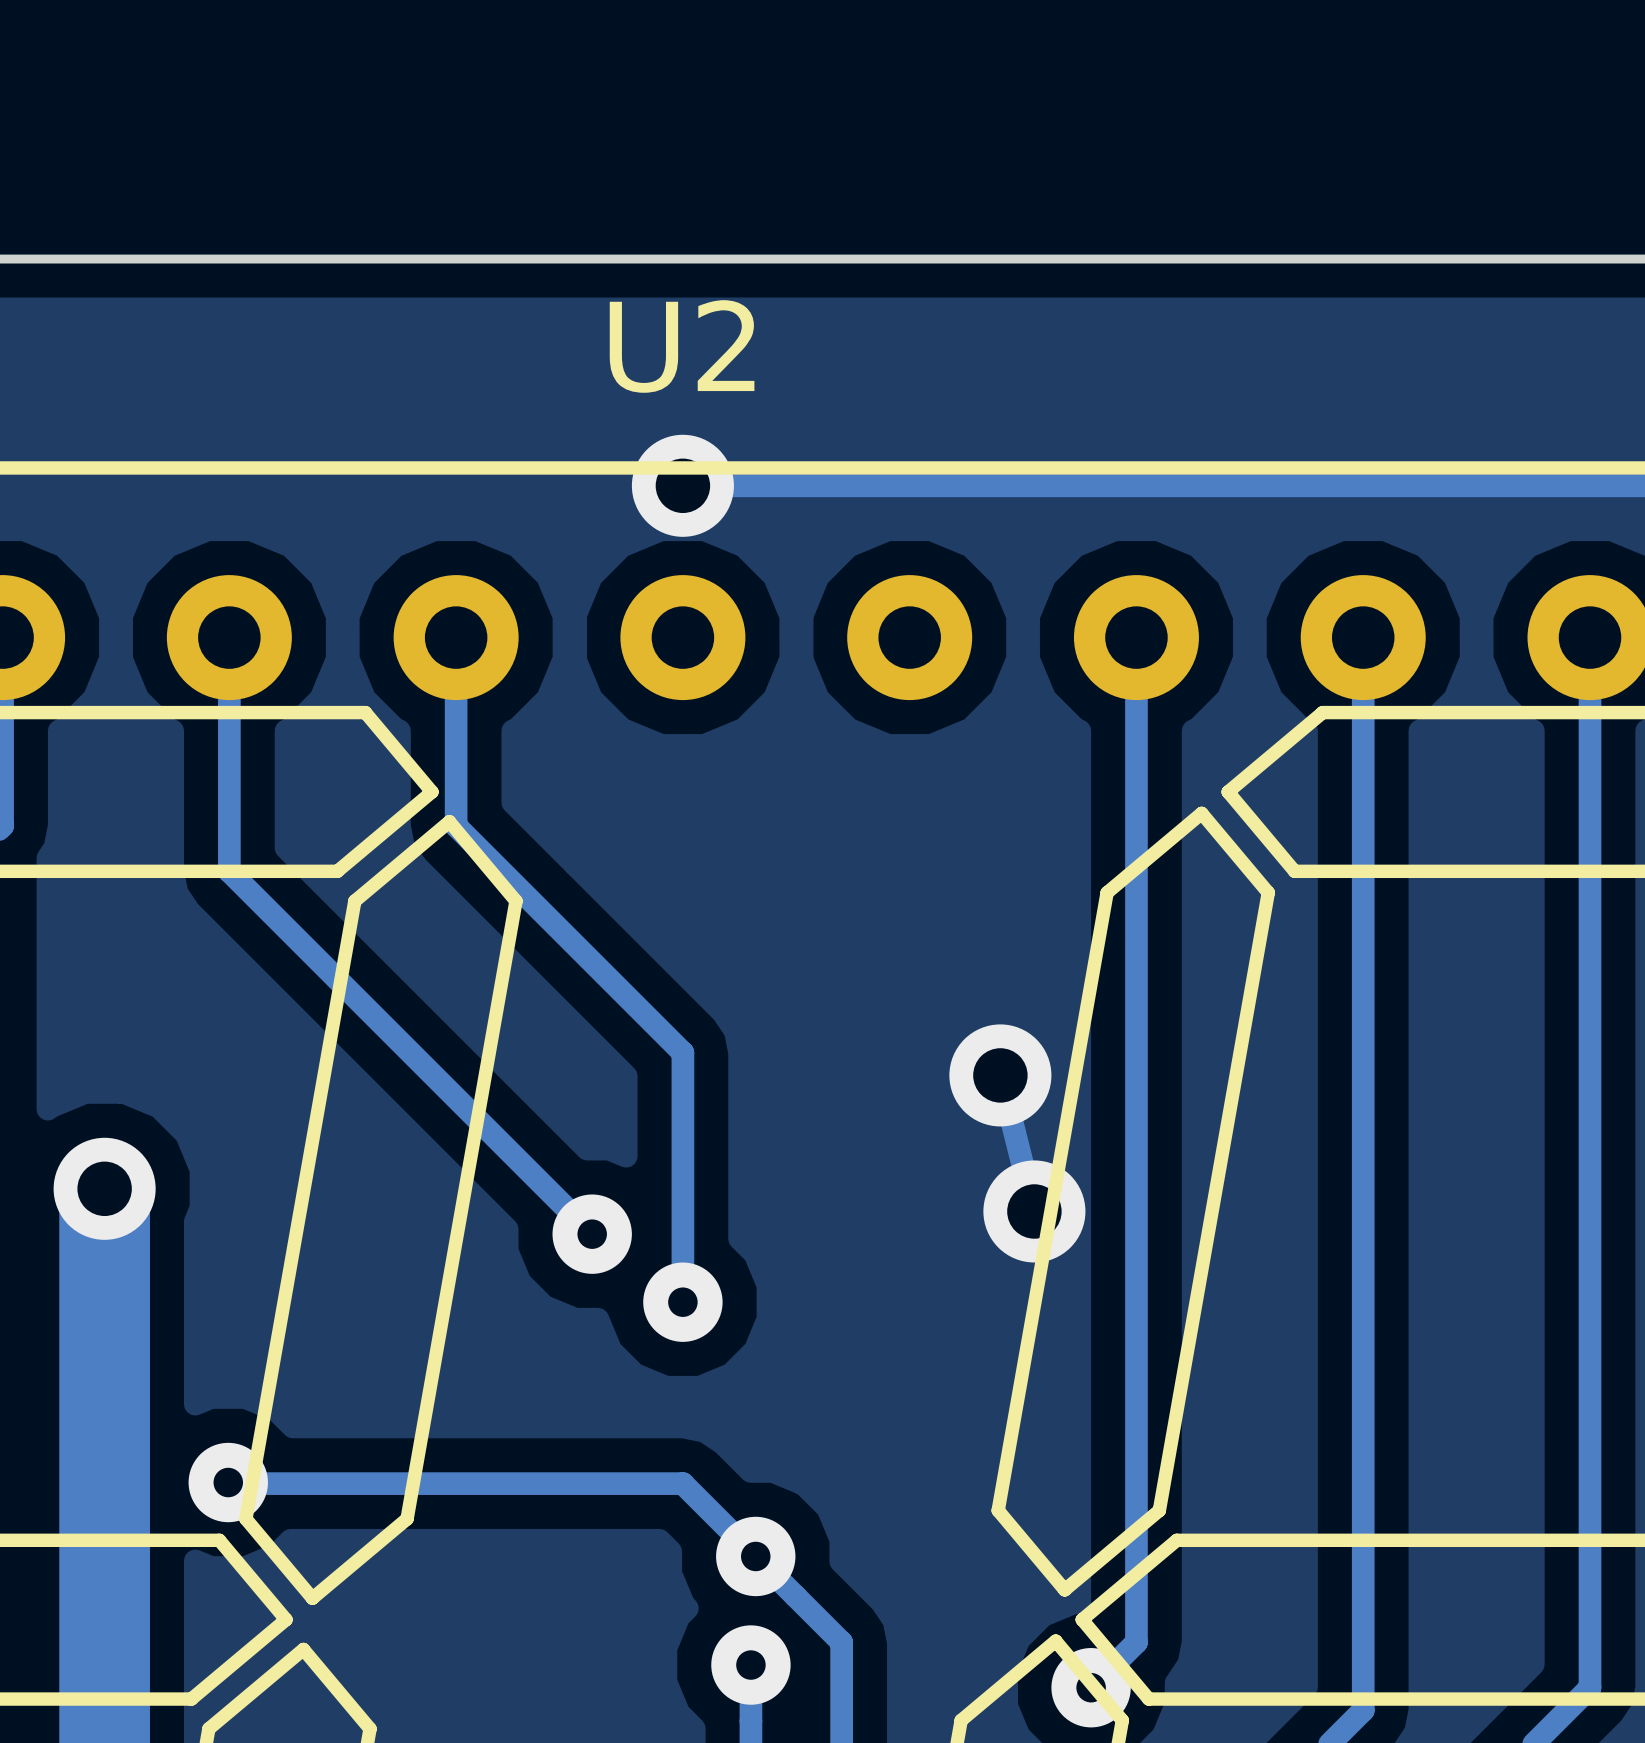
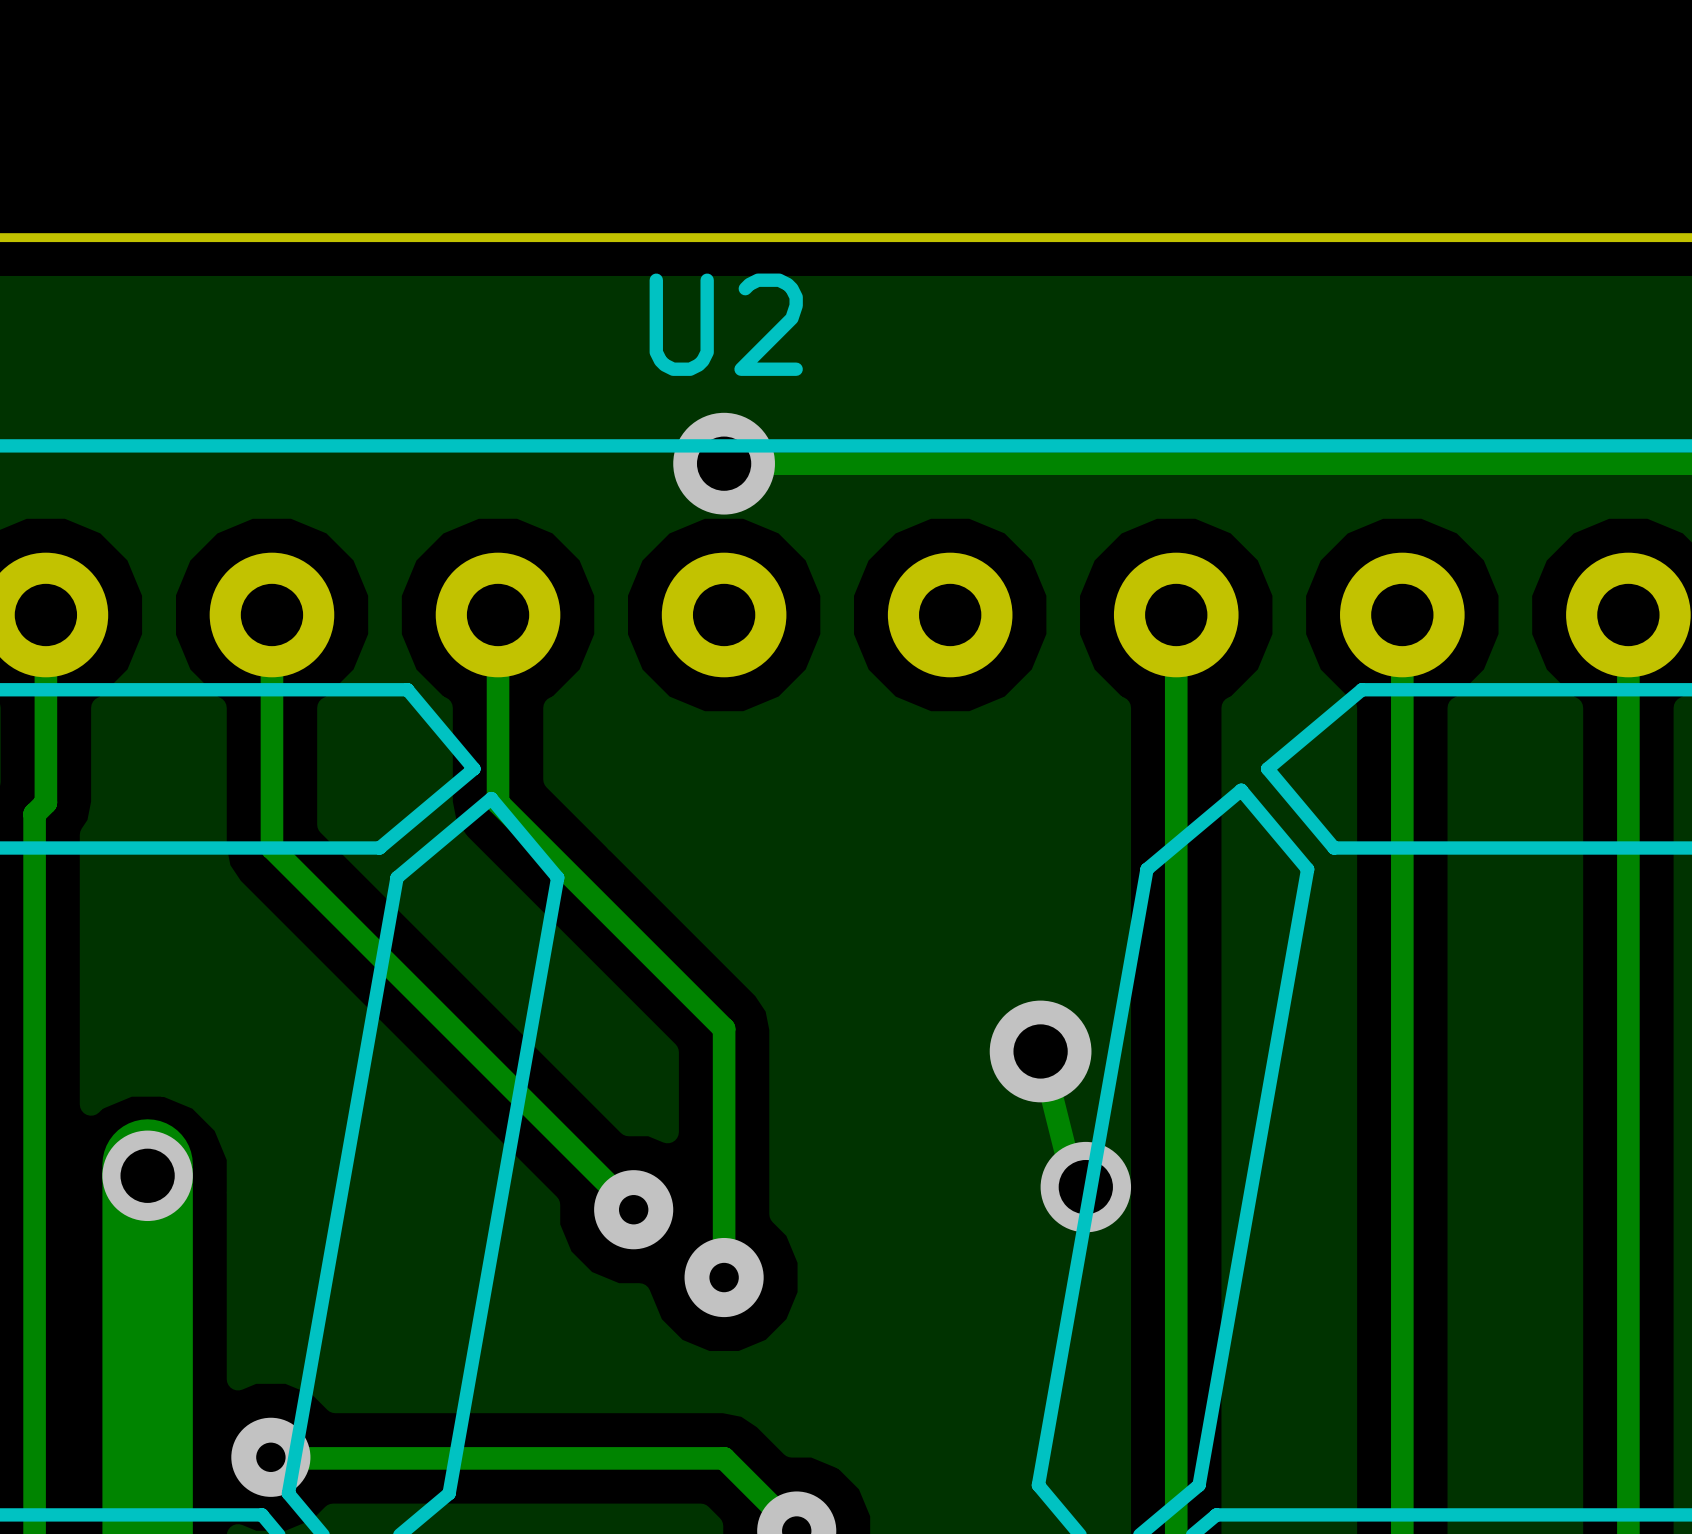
via size: [53, 1137, 156, 1240] -> [102, 1130, 193, 1222]
via size: [983, 1160, 1086, 1263] -> [1040, 1141, 1132, 1233]

